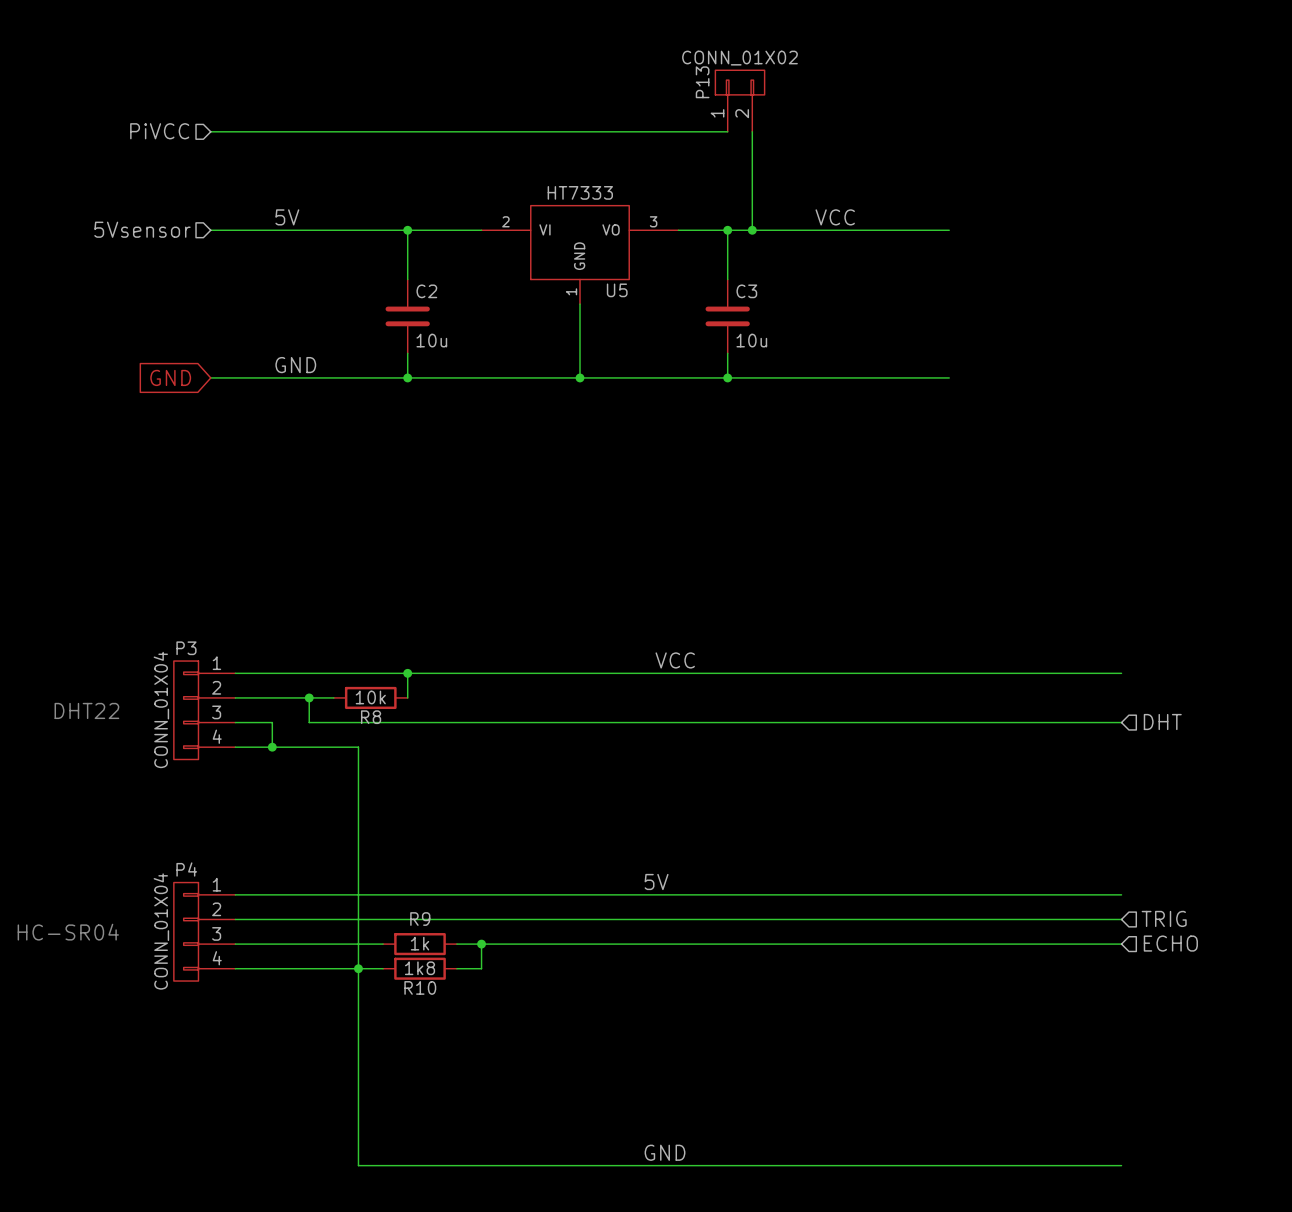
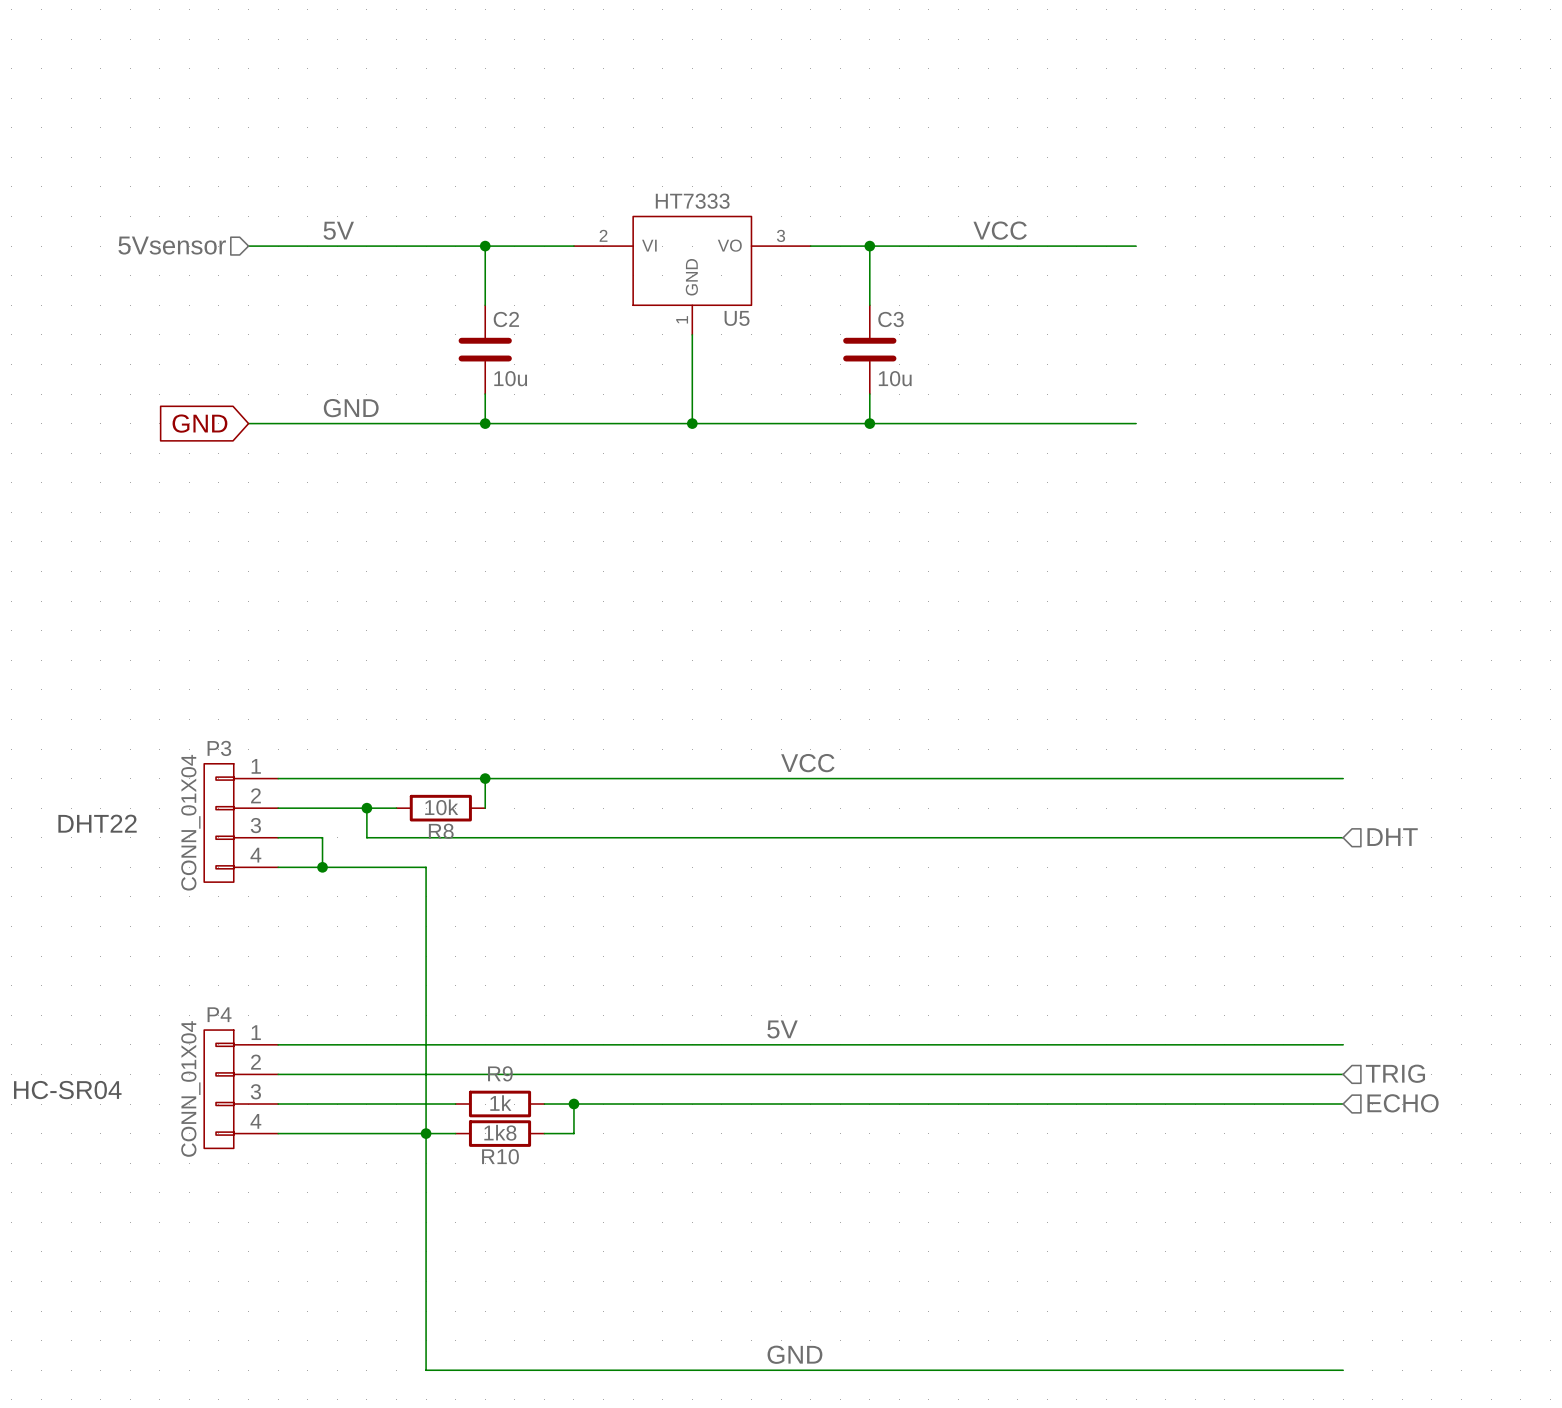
P13: CONN_01X02 (740, 101) -> none
hierarchical label: PiVCC (159, 131) -> none
wire: (210, 131) (727, 131) -> none
wire: (752, 131) (752, 230) -> none
junction: (752, 230) -> none

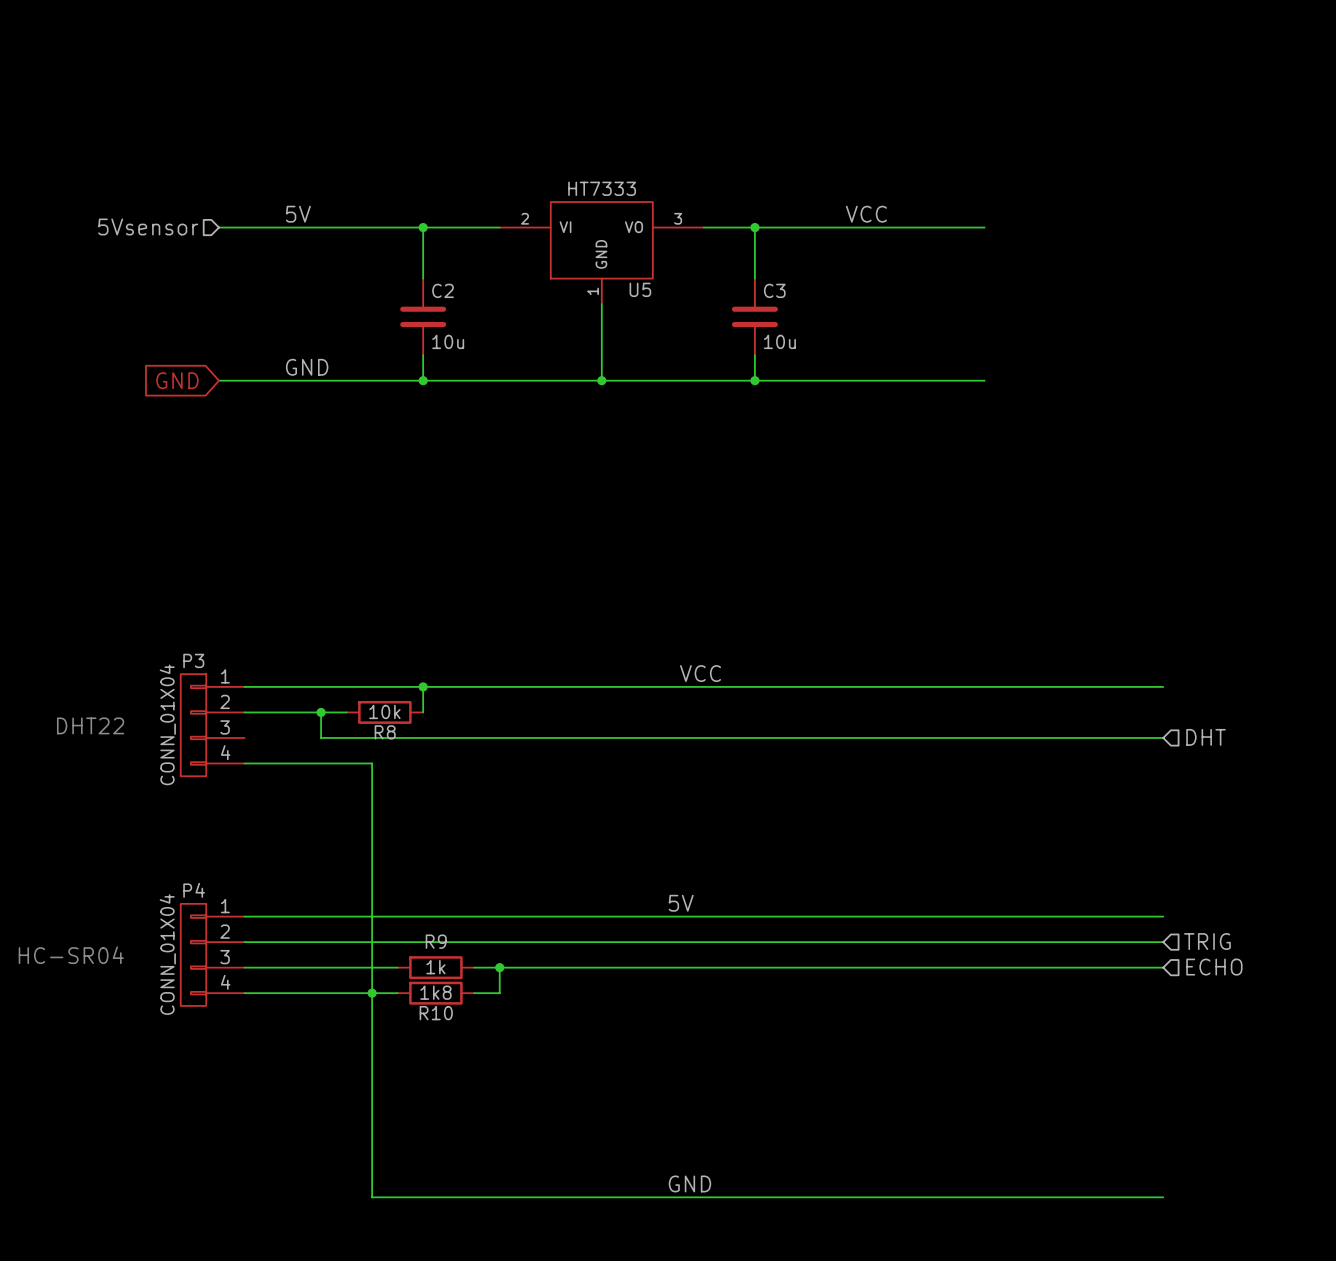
wire: (278, 837) (322, 837) (322, 867) -> none
junction: (322, 867) -> none

